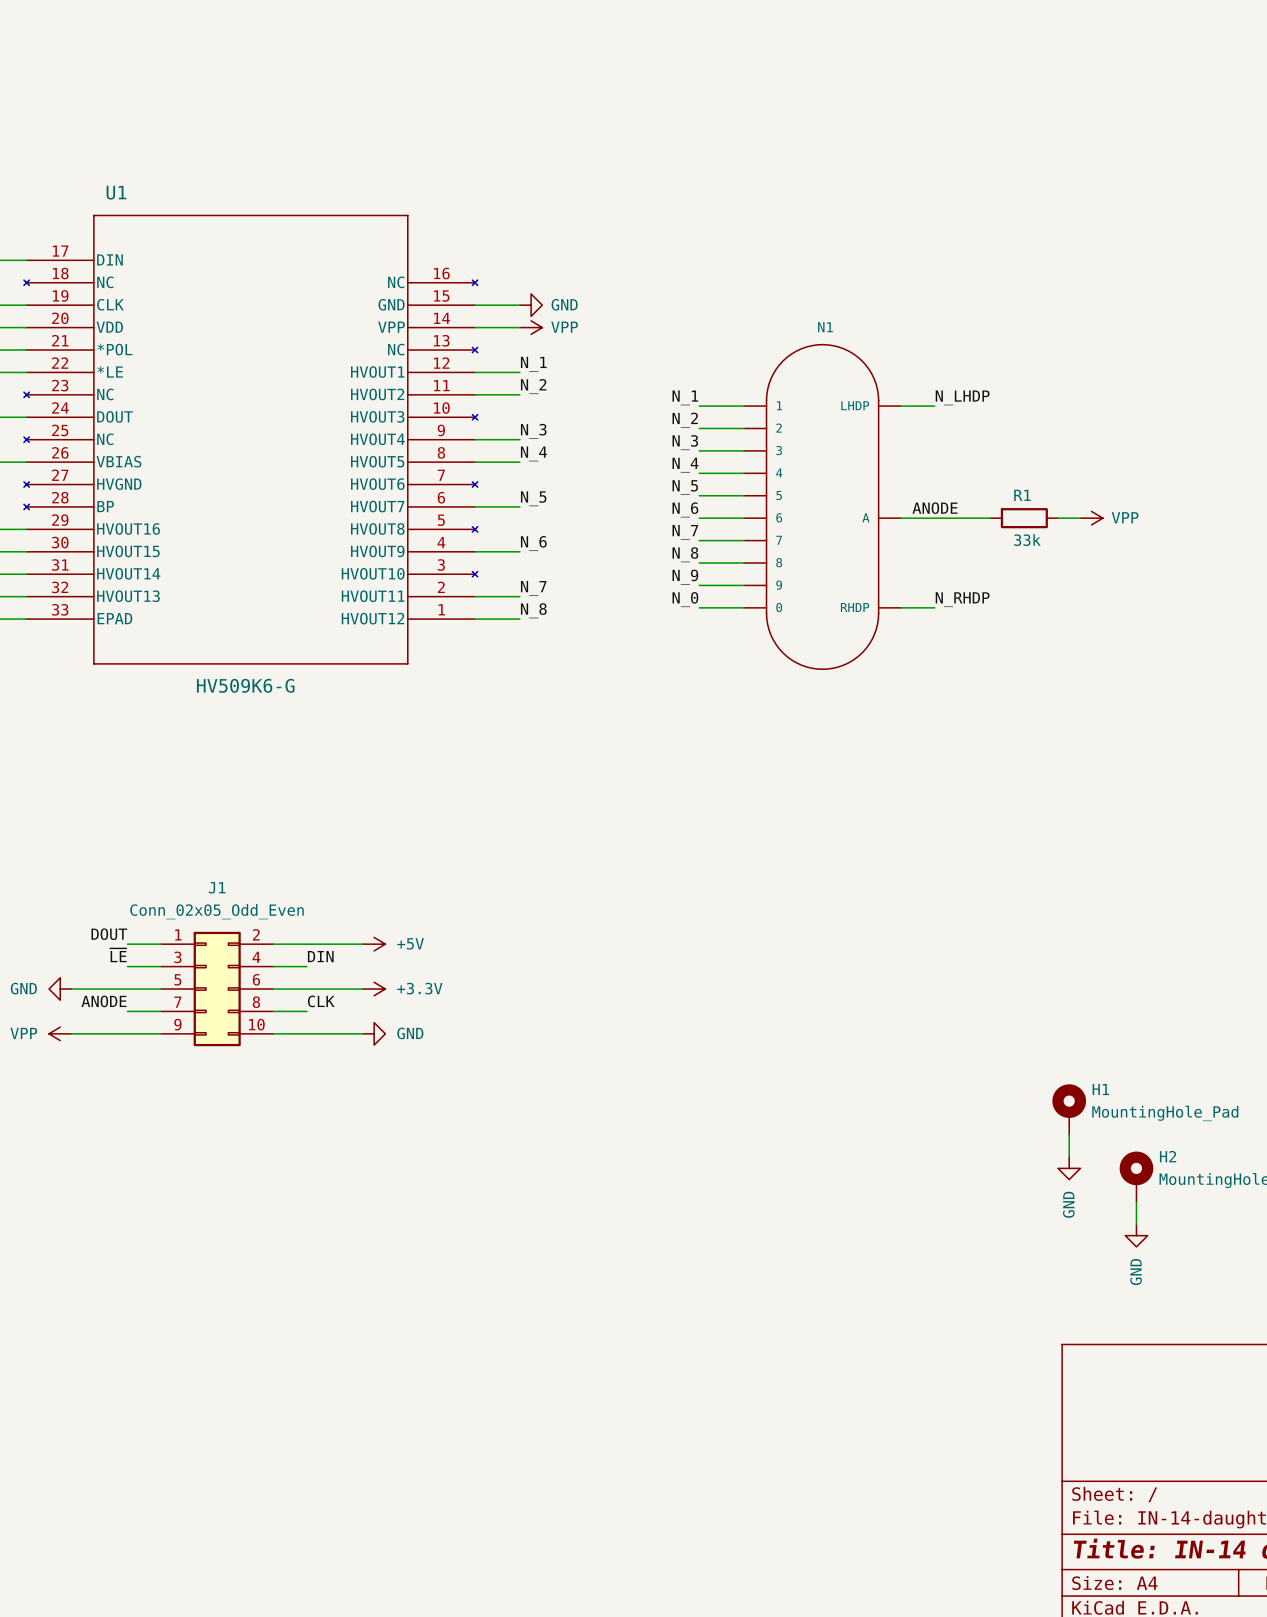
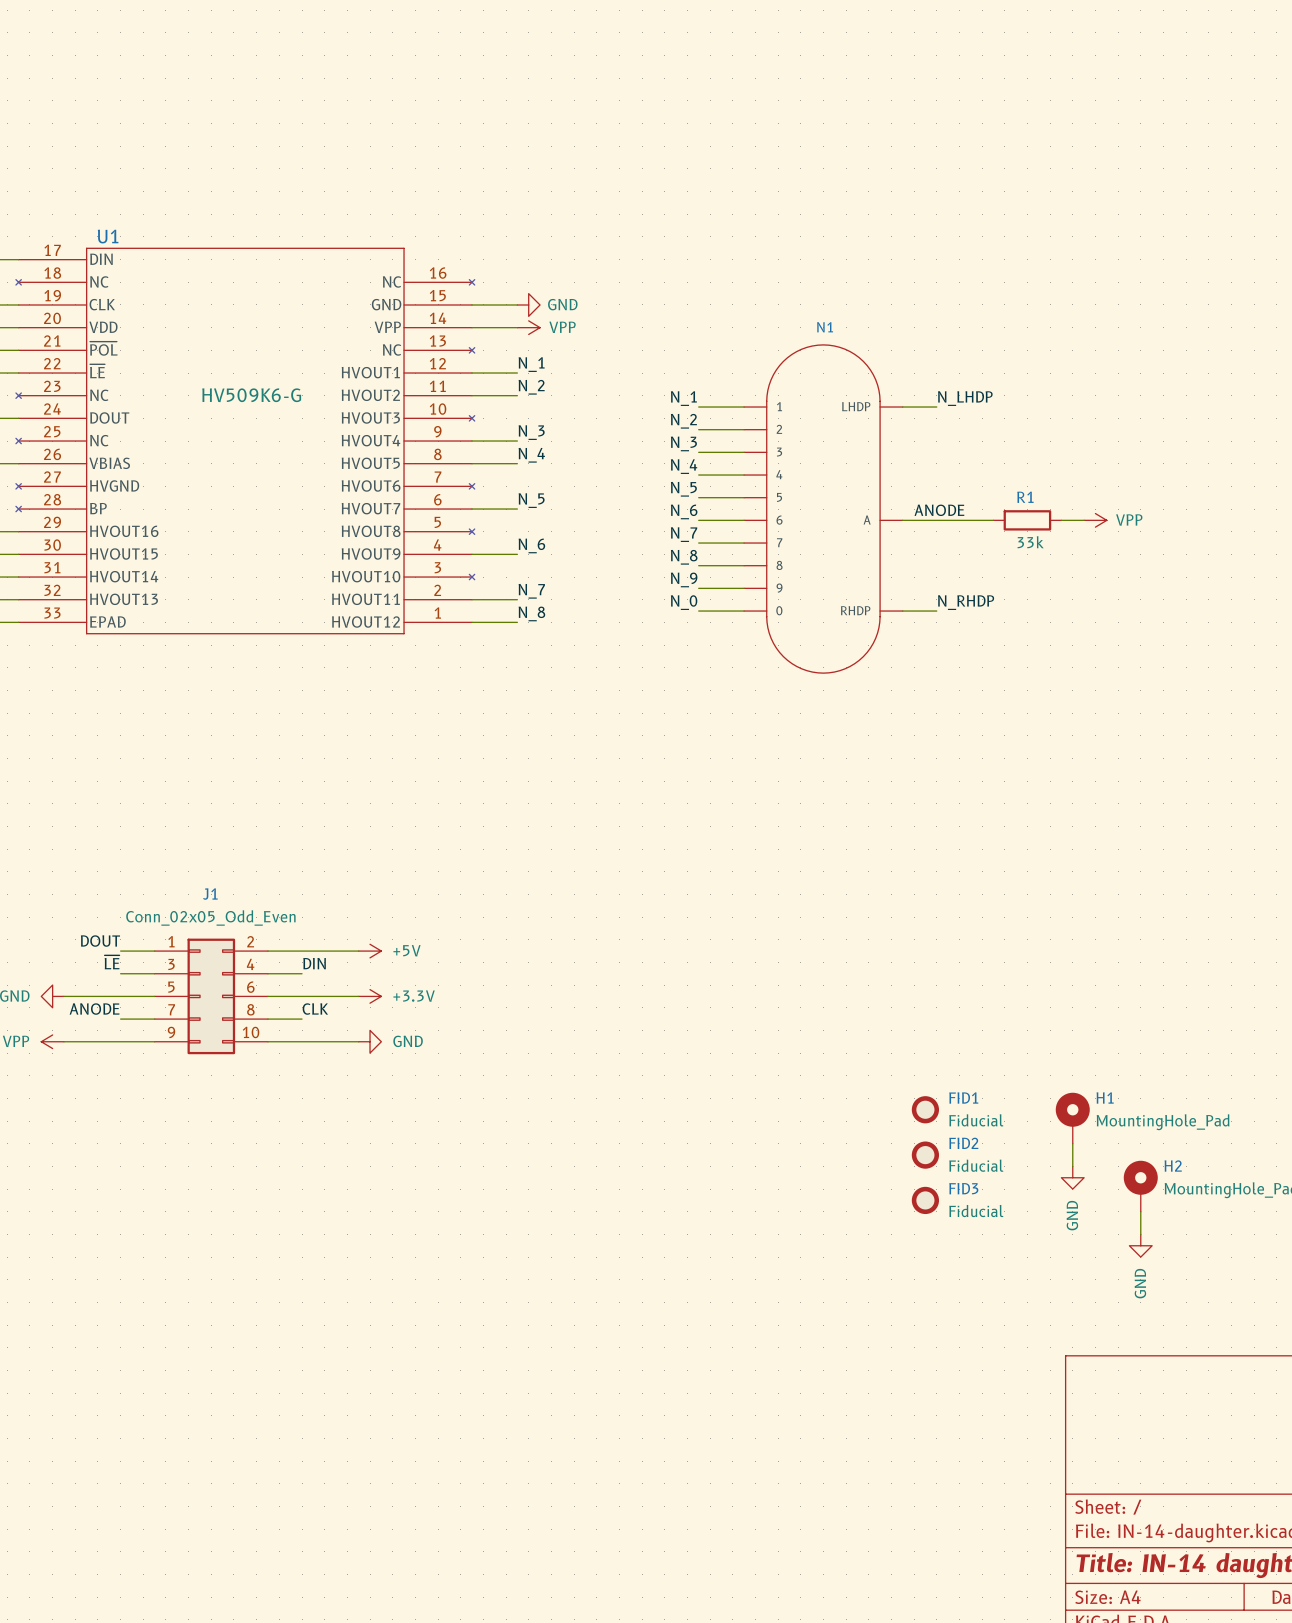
U1 name position: U1 (116, 192) -> U1 (108, 236)
U1 symbol: [23, 214, 478, 665] -> [15, 247, 475, 635]
U1 value position: HV509K6-G (245, 685) -> HV509K6-G (251, 395)
FID1: none -> Fiducial (925, 1109)
FID2: none -> Fiducial (925, 1155)
FID3: none -> Fiducial (925, 1200)

